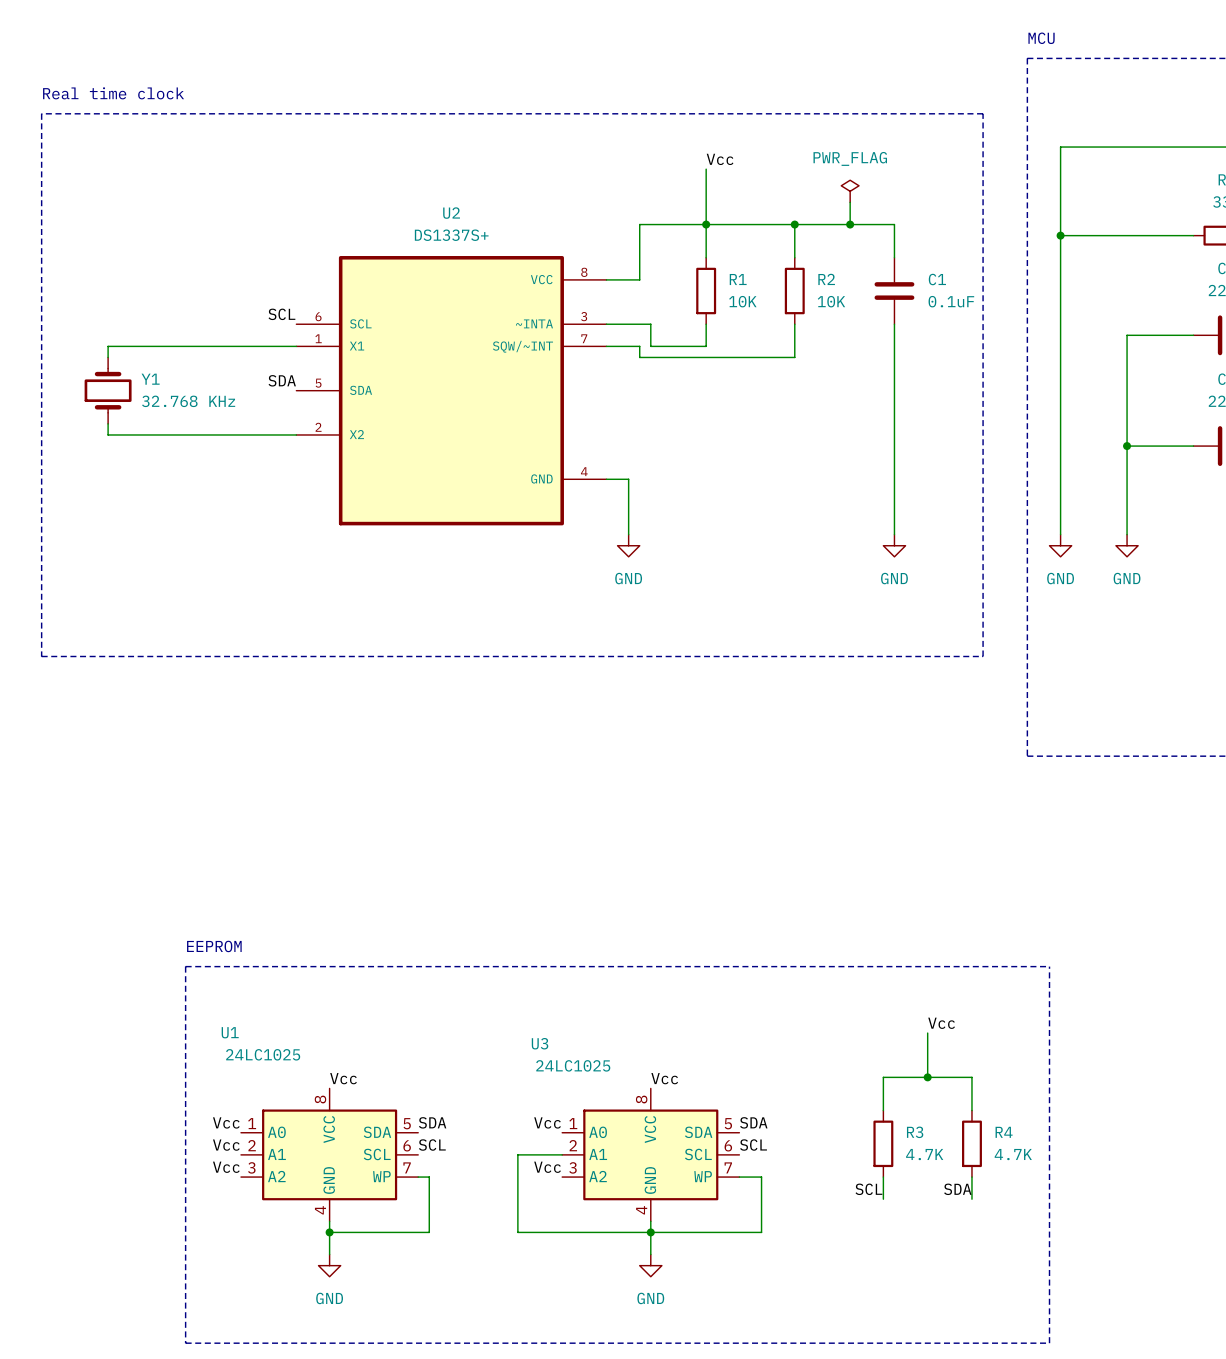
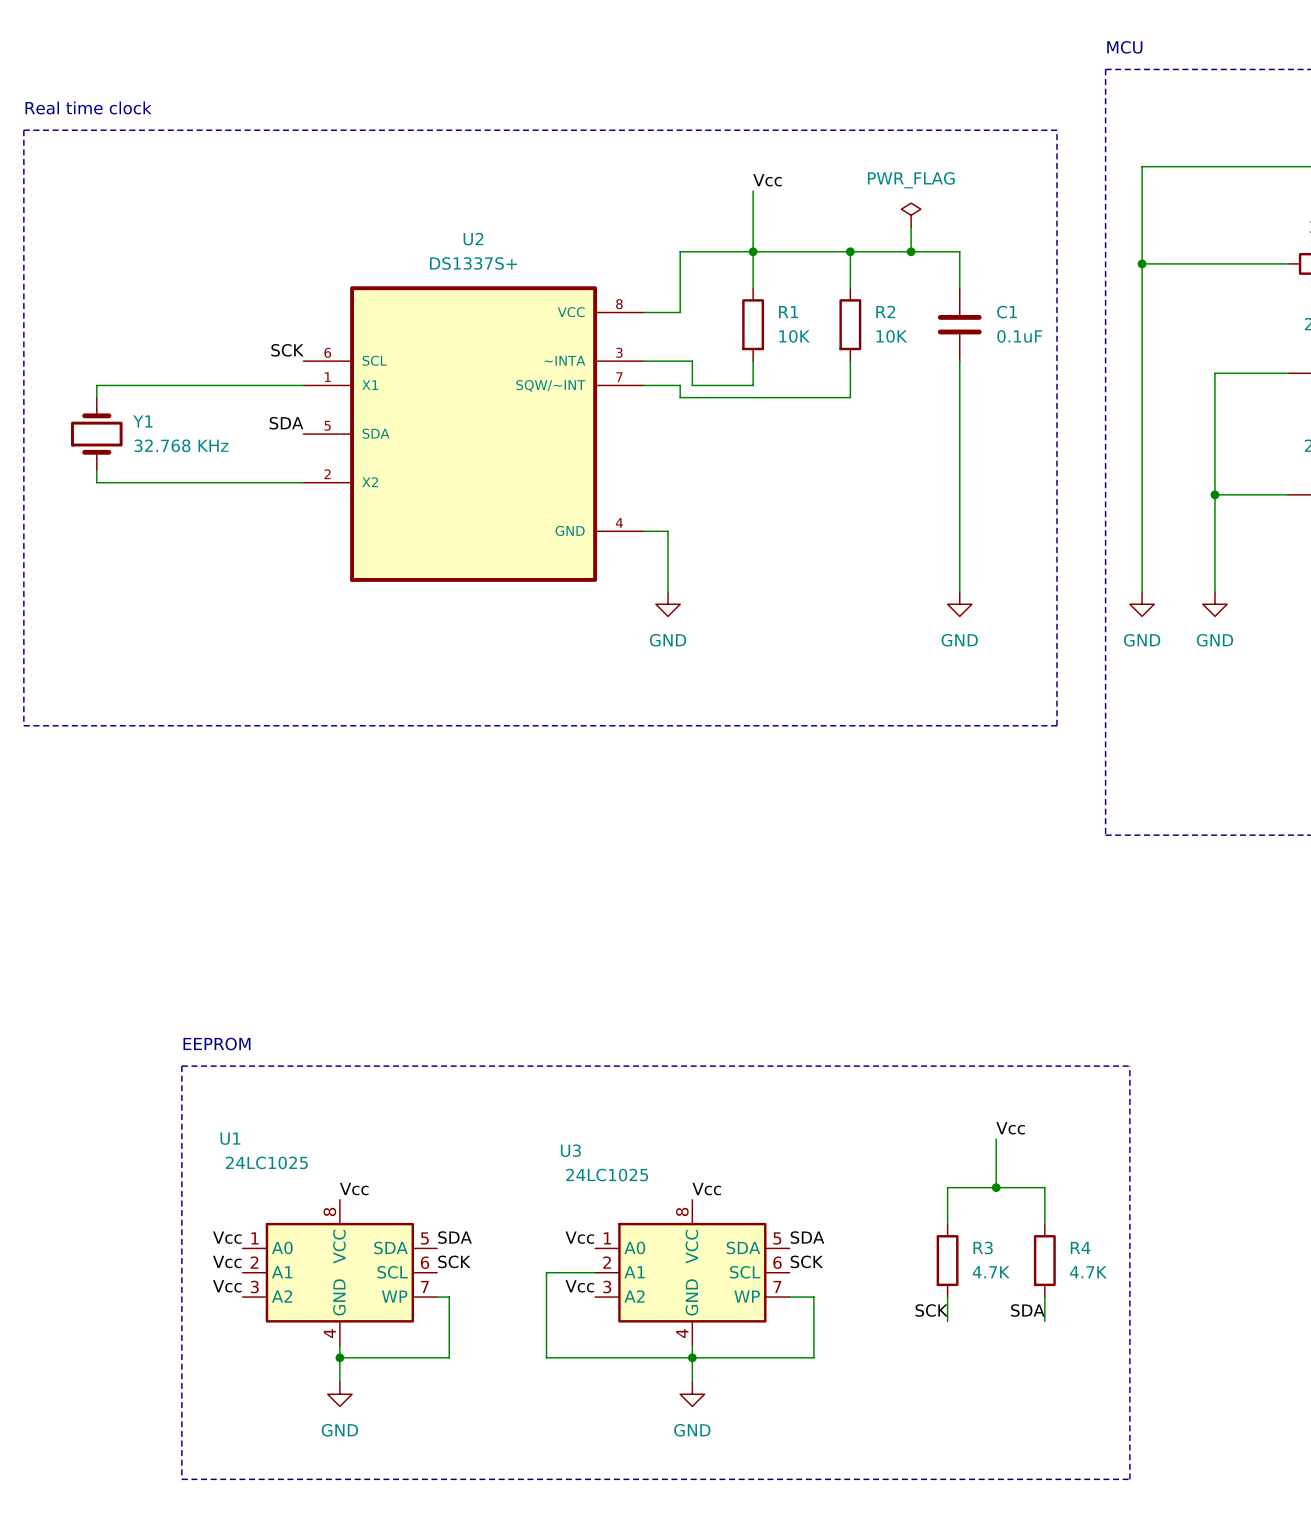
label: SCL (281, 314) -> SCK (287, 350)
label: SCL (432, 1145) -> SCK (454, 1261)
label: SCL (753, 1145) -> SCK (806, 1261)
label: SCL (868, 1189) -> SCK (931, 1310)

